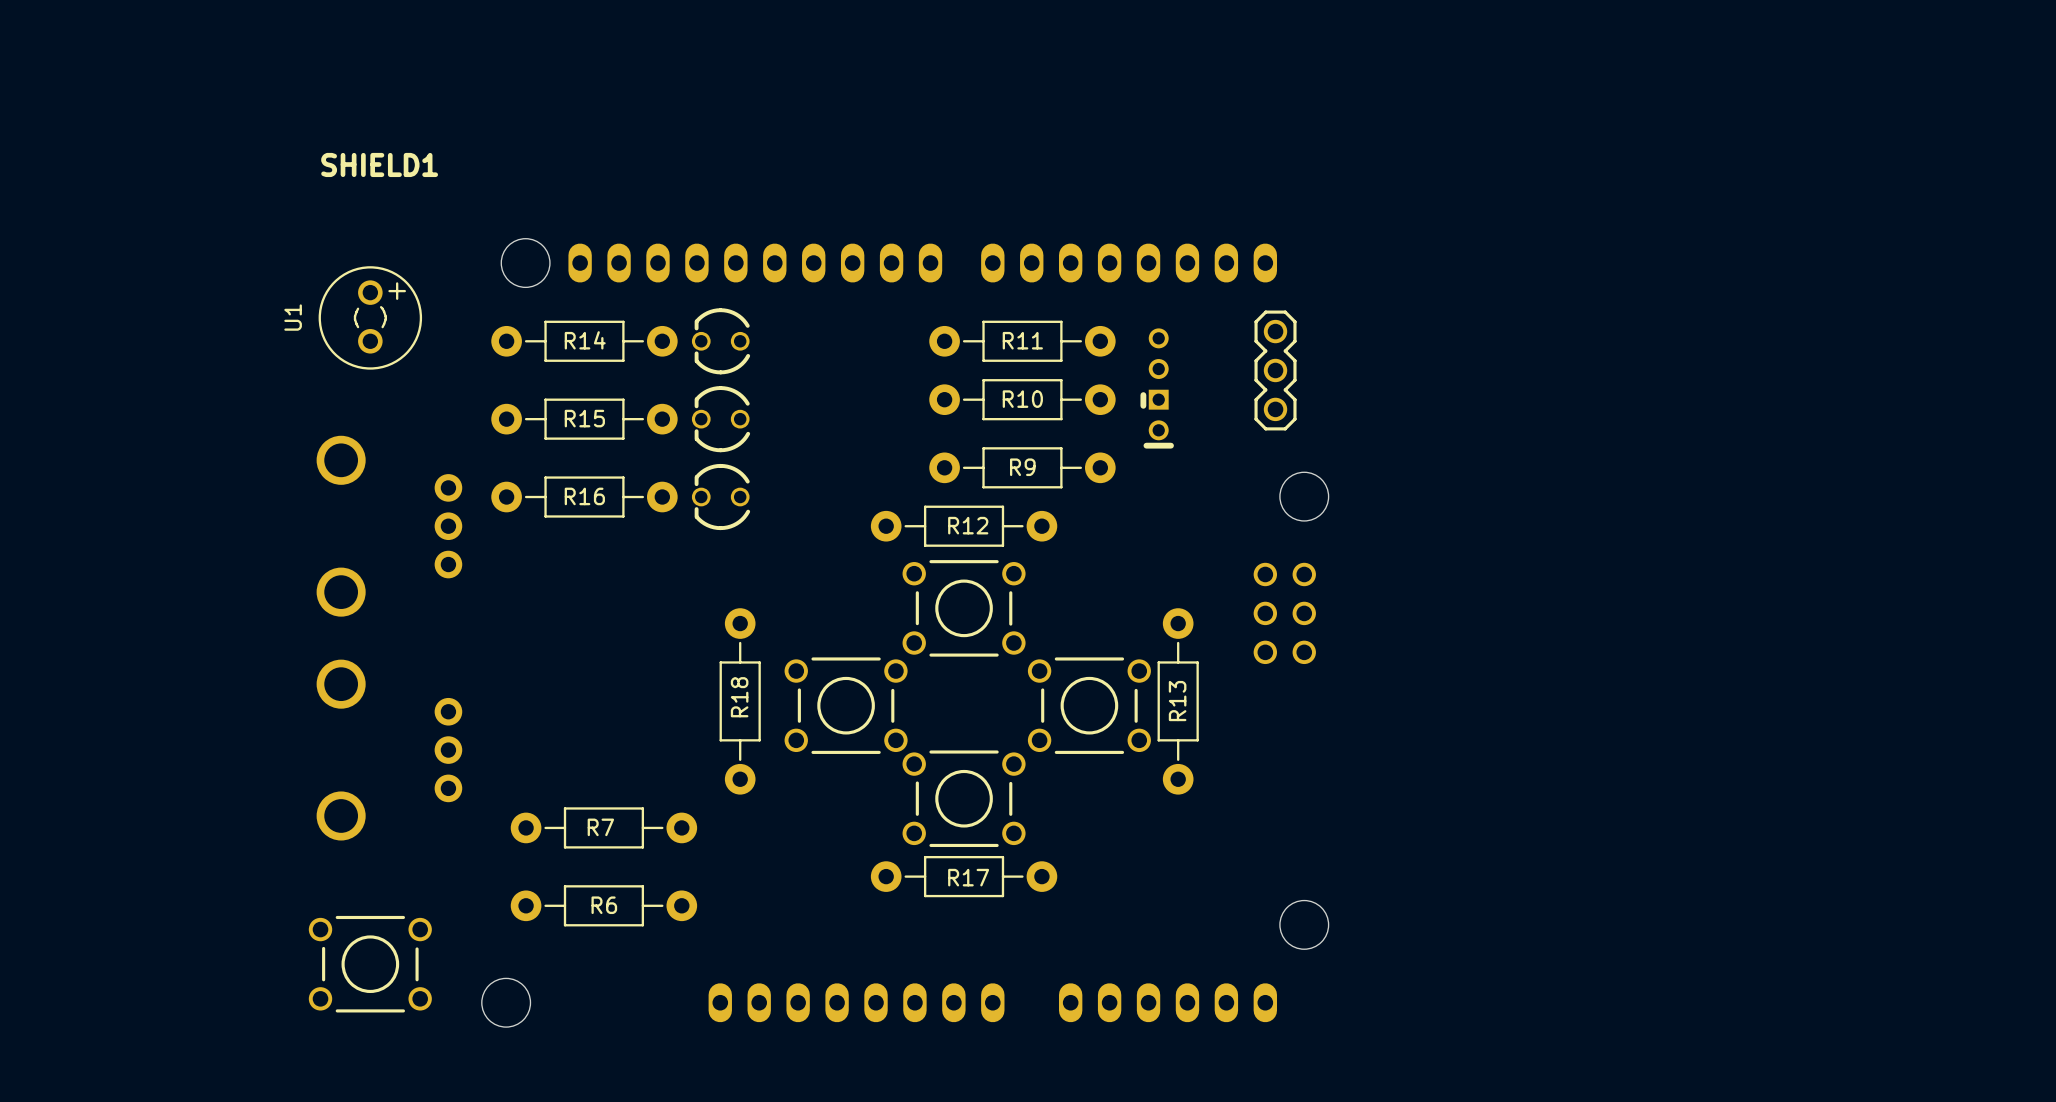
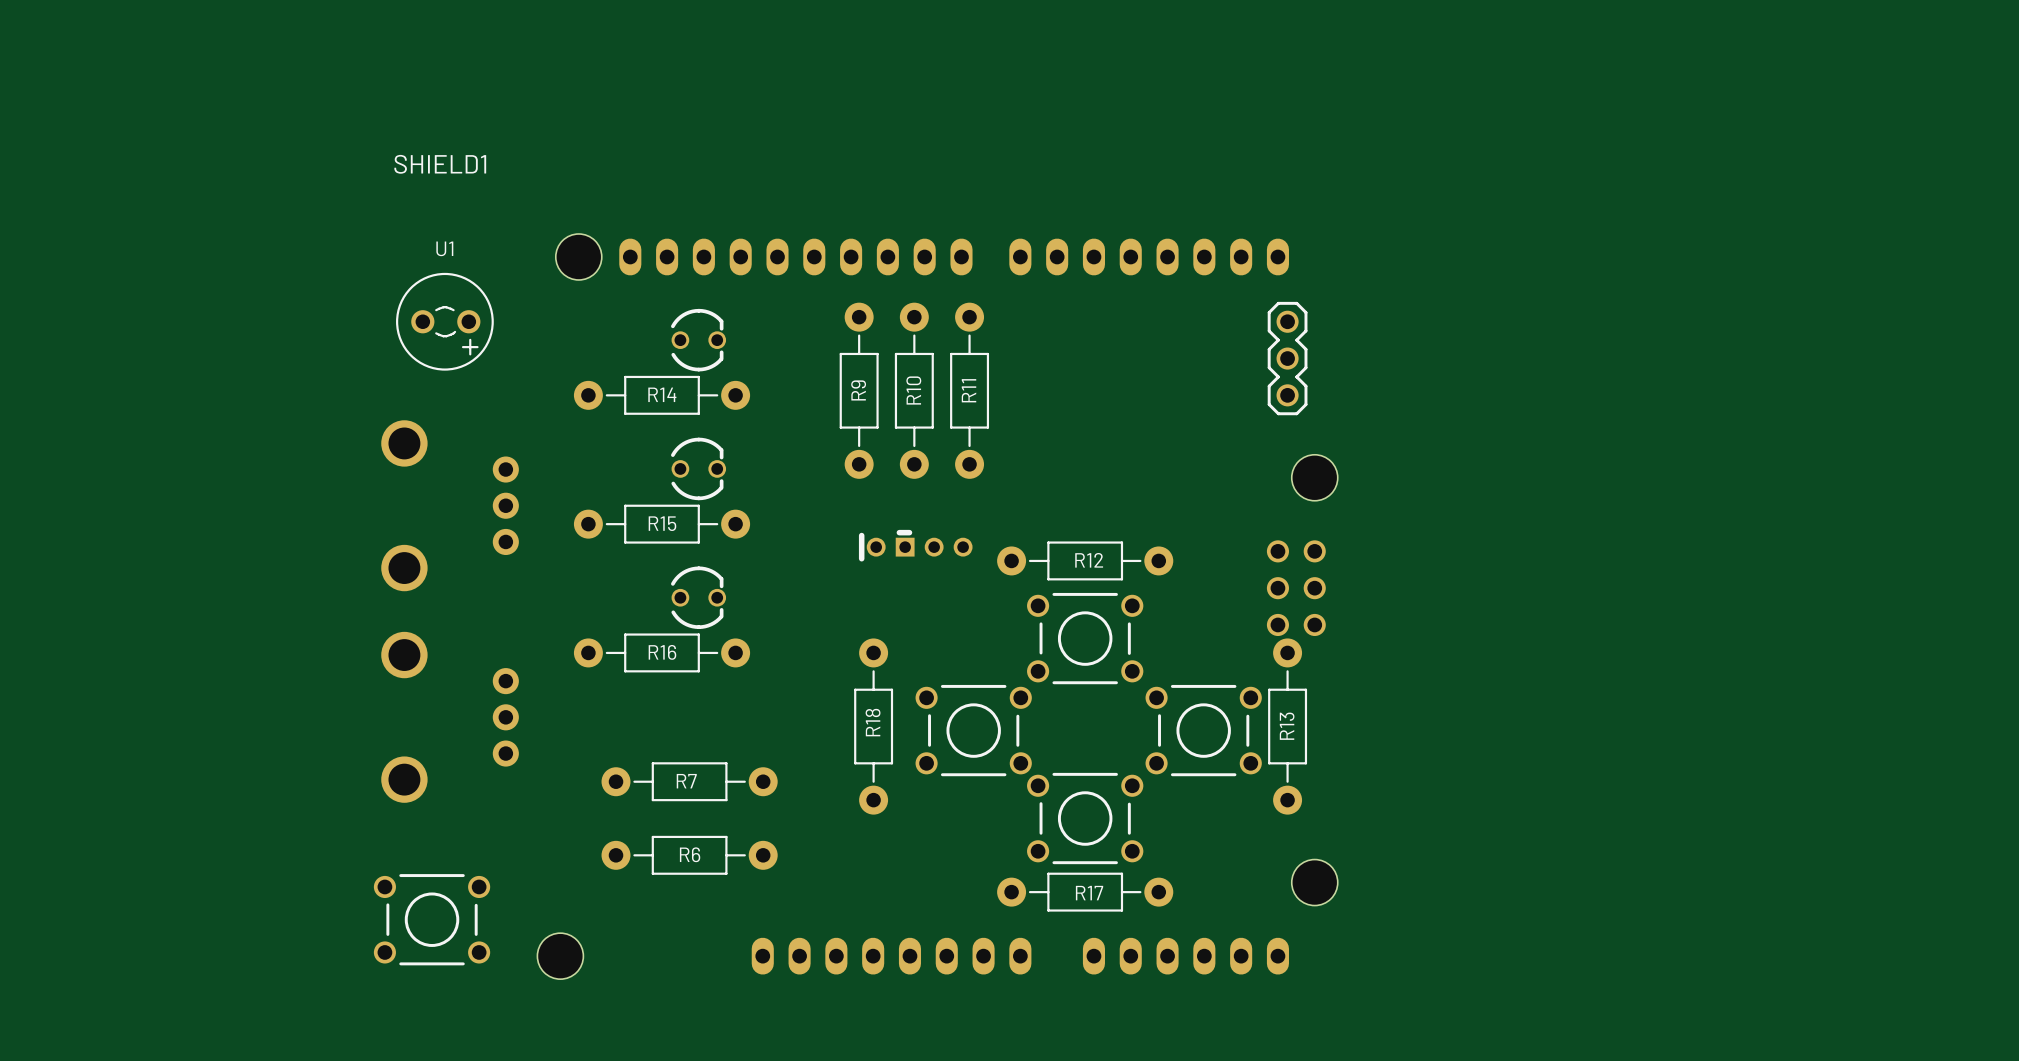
U1 rotation: 0° (370, 317) -> 90° clockwise (444, 321)
R14 position: (584, 341) -> (662, 395)
part: (721, 341) -> none
R11 rotation: 0° (1022, 341) -> 90° clockwise (969, 390)
part: none -> (698, 340)
part rotation: 0° (1157, 388) -> 90° clockwise (915, 545)
part position: (1157, 388) -> (915, 545)
R10 rotation: 0° (1022, 399) -> 90° clockwise (914, 390)
R10 position: (1022, 399) -> (914, 390)
R15 position: (584, 419) -> (662, 524)
part: (721, 419) -> none
R9 rotation: 0° (1022, 467) -> 90° clockwise (859, 390)
R9 position: (1022, 467) -> (859, 390)
part: none -> (698, 468)
R16 position: (584, 497) -> (662, 652)
part: (721, 497) -> none
R12 position: (964, 526) -> (1085, 560)
part: (964, 608) -> none
part: none -> (698, 597)
R18 position: (740, 701) -> (873, 726)
R13 position: (1178, 701) -> (1287, 726)
part: (846, 705) -> none
part position: (1089, 705) -> (1085, 638)
part: none -> (1203, 730)
part position: (964, 798) -> (973, 730)
R7 position: (603, 827) -> (689, 781)
part: none -> (1085, 818)
R17 position: (964, 876) -> (1085, 892)
R6 position: (603, 905) -> (689, 855)

